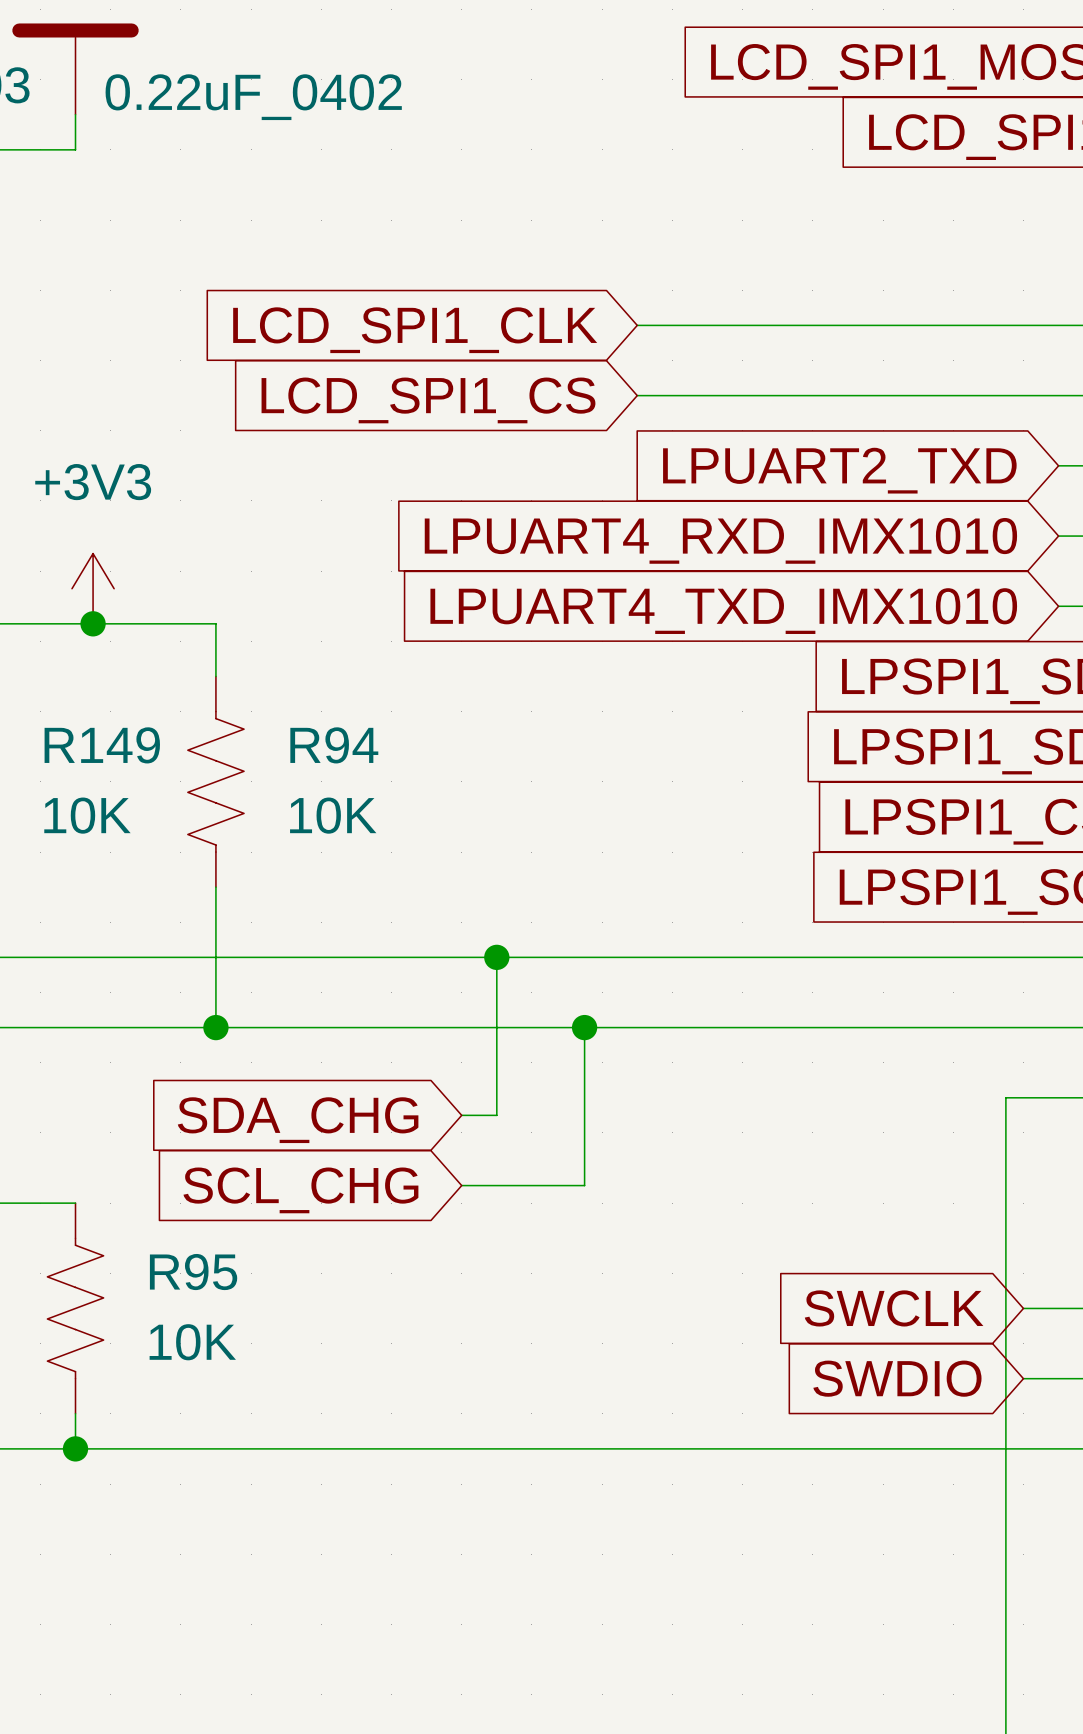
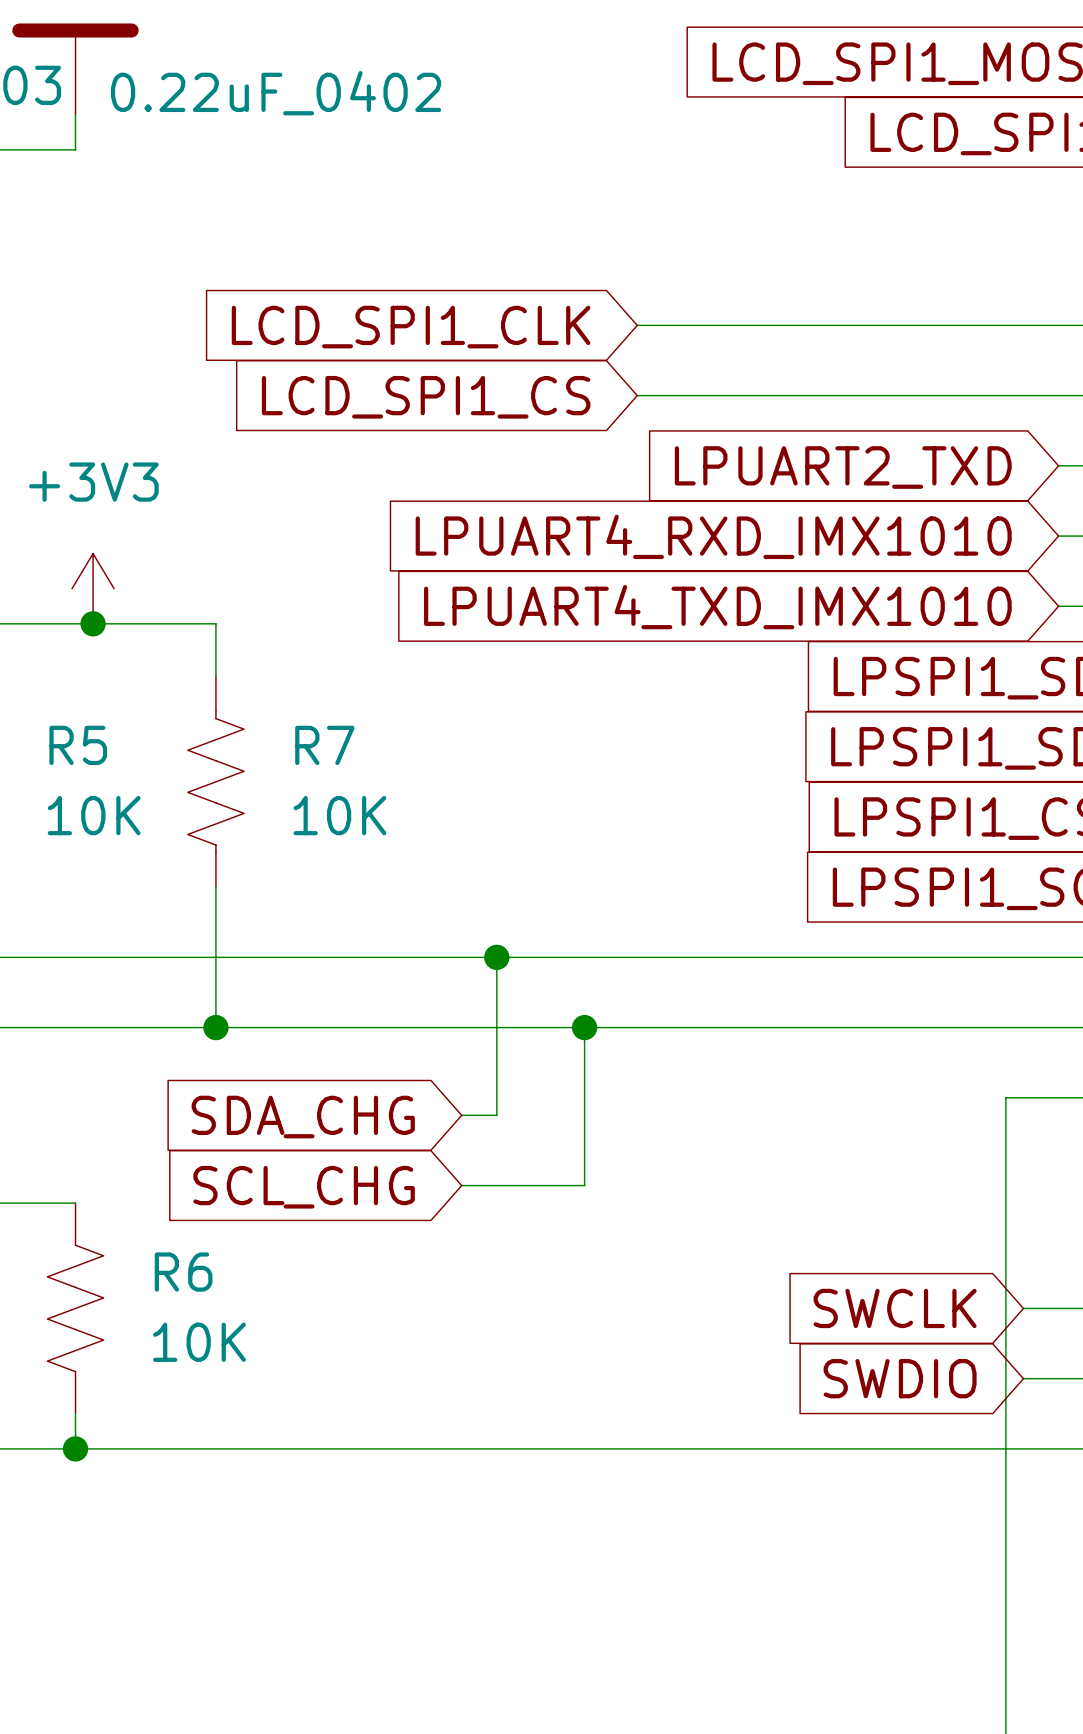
R149 name: R149 (102, 745) -> R5 (78, 745)
R94 name: R94 (334, 745) -> R7 (324, 745)
R95 name: R95 (193, 1272) -> R6 (183, 1272)

